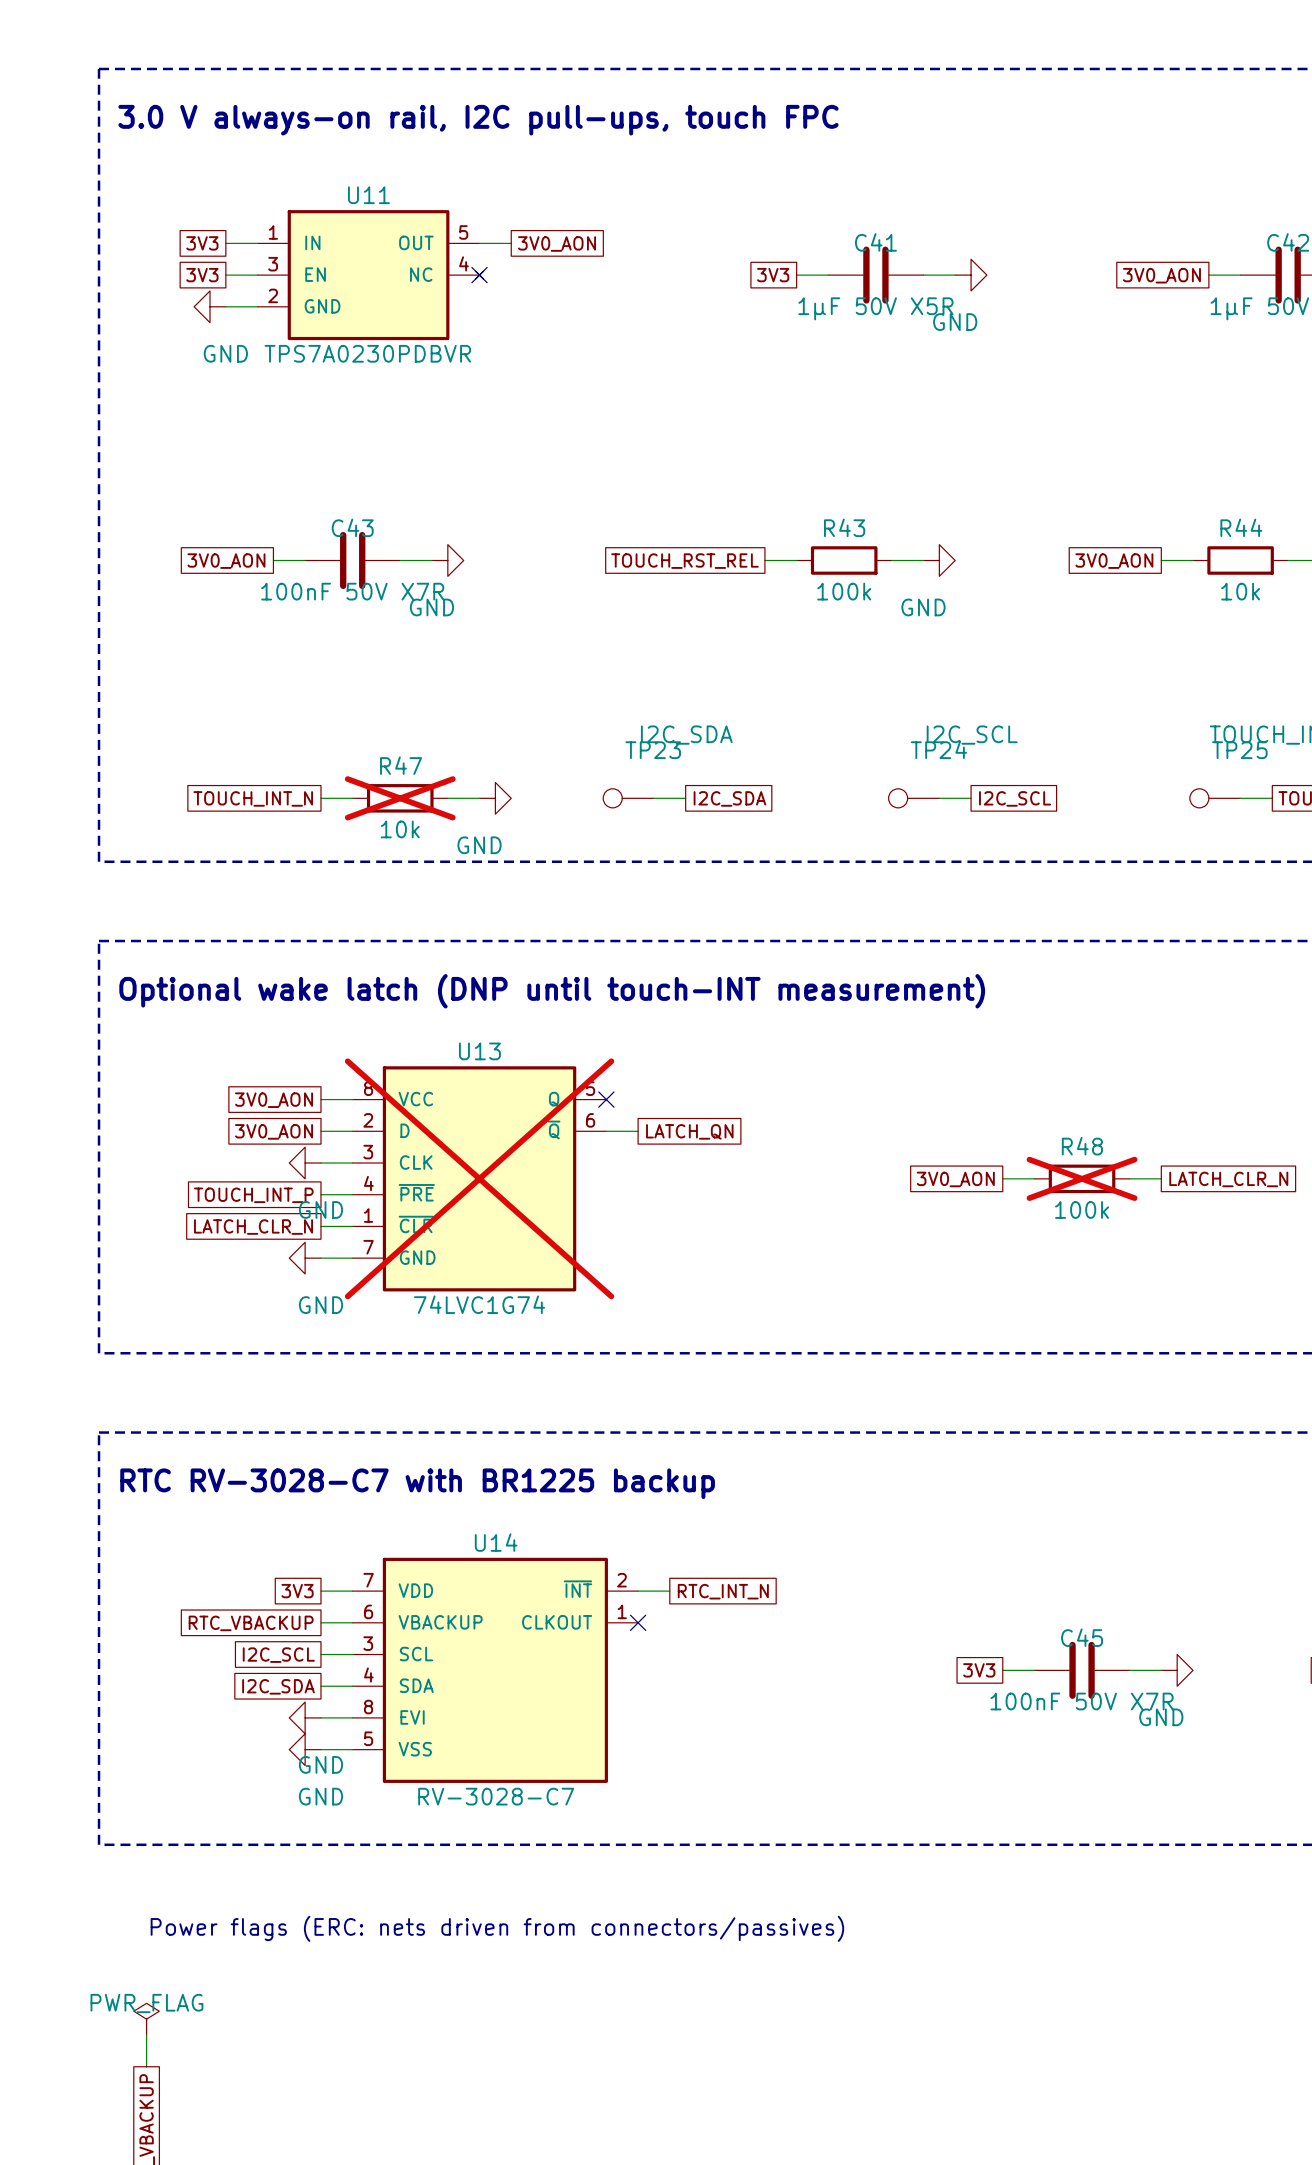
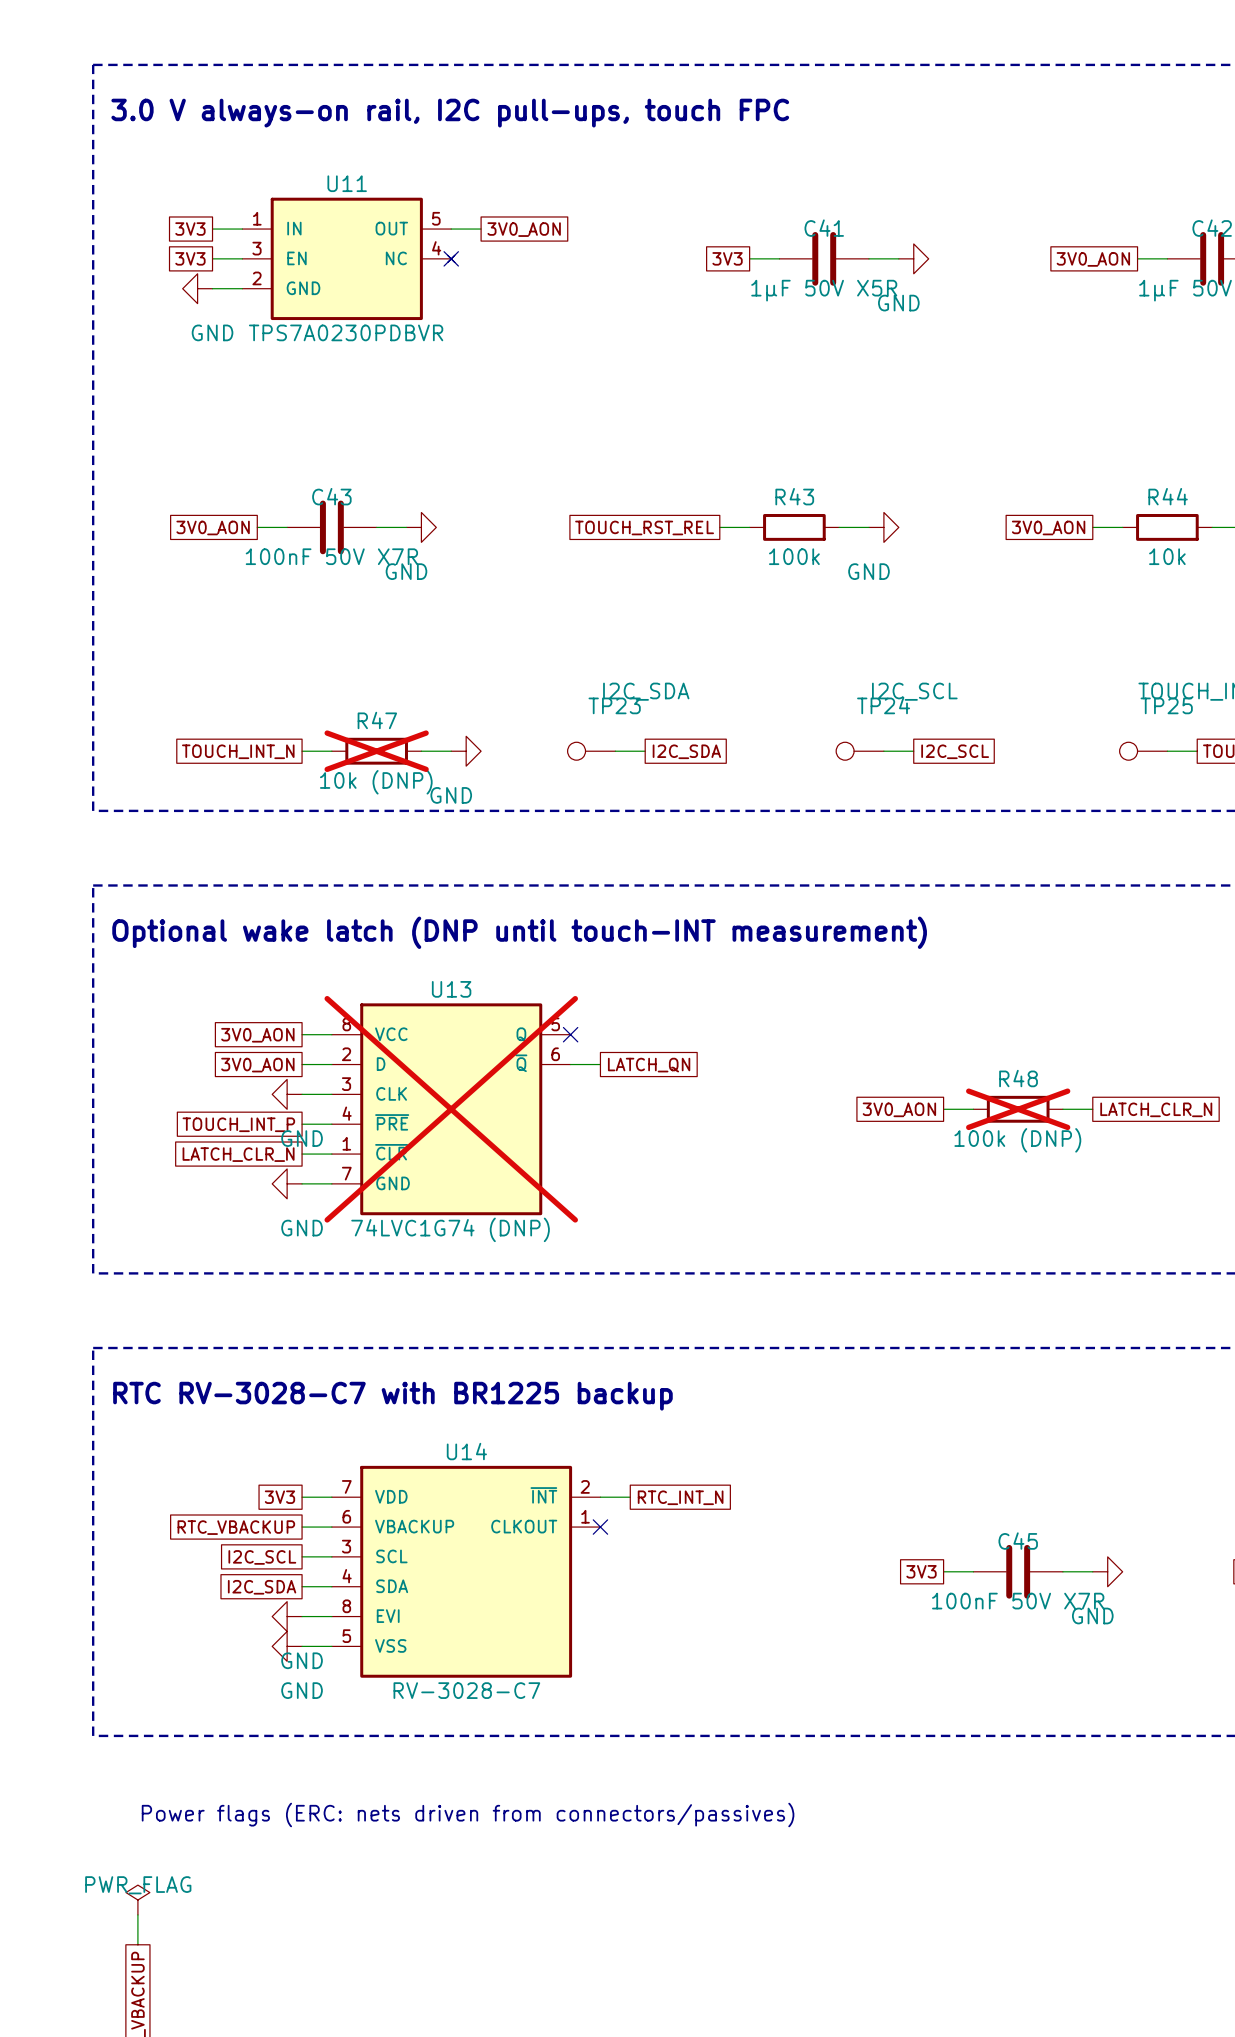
R47 value: 10k (400, 829) -> 10k (DNP) (376, 782)
R48 value: 100k (1082, 1209) -> 100k (DNP) (1017, 1140)
U13 value: 74LVC1G74 (479, 1304) -> 74LVC1G74 (DNP) (450, 1229)

